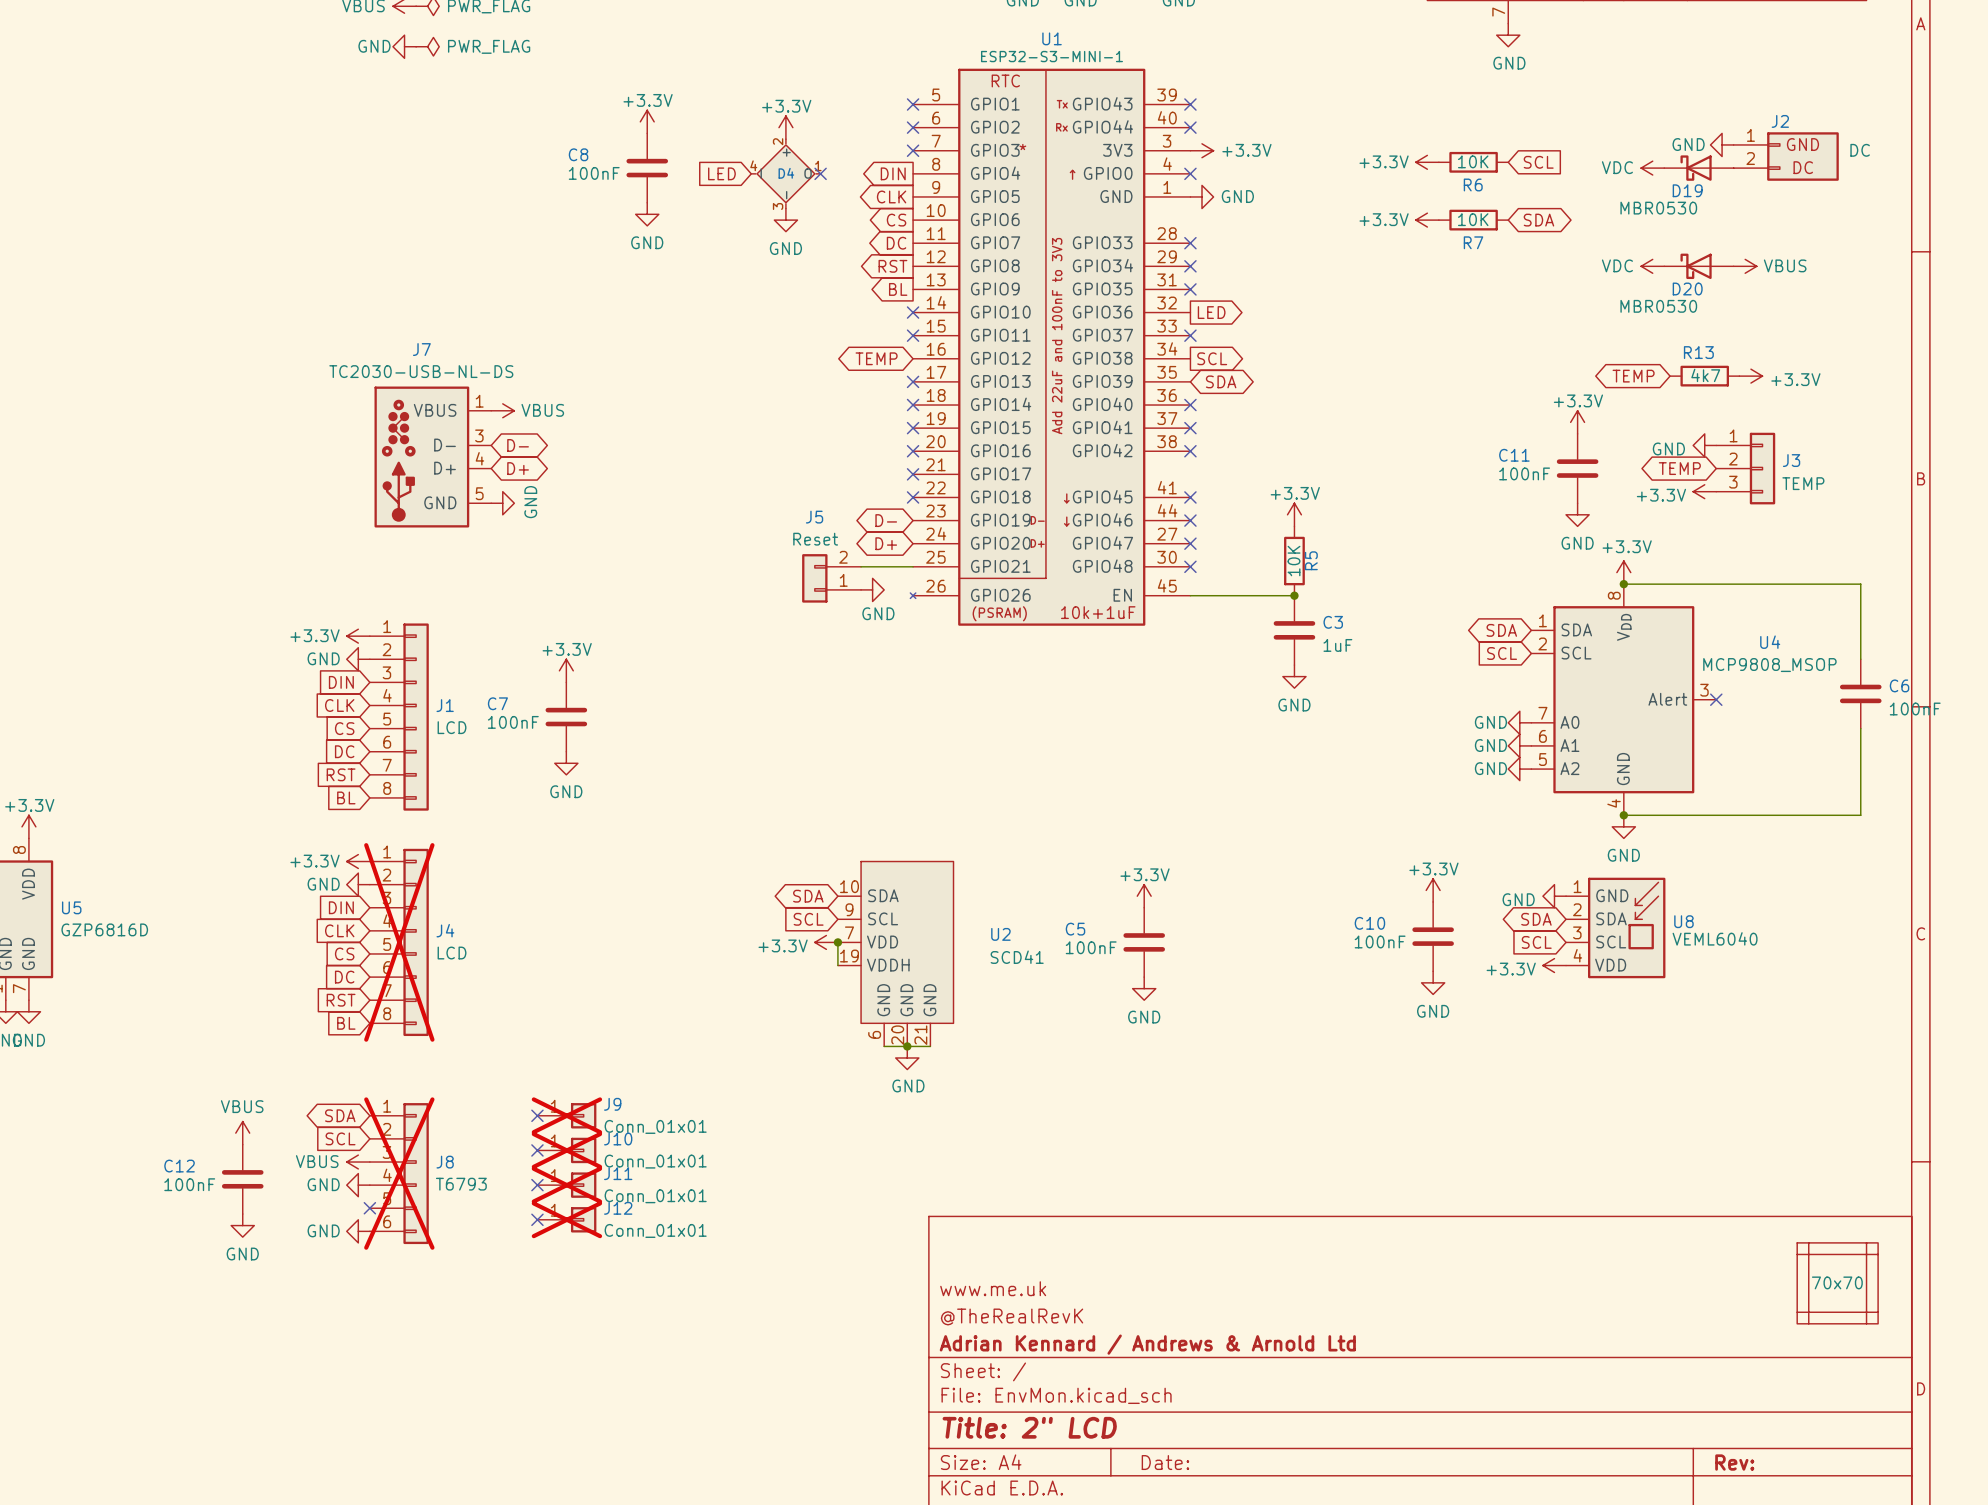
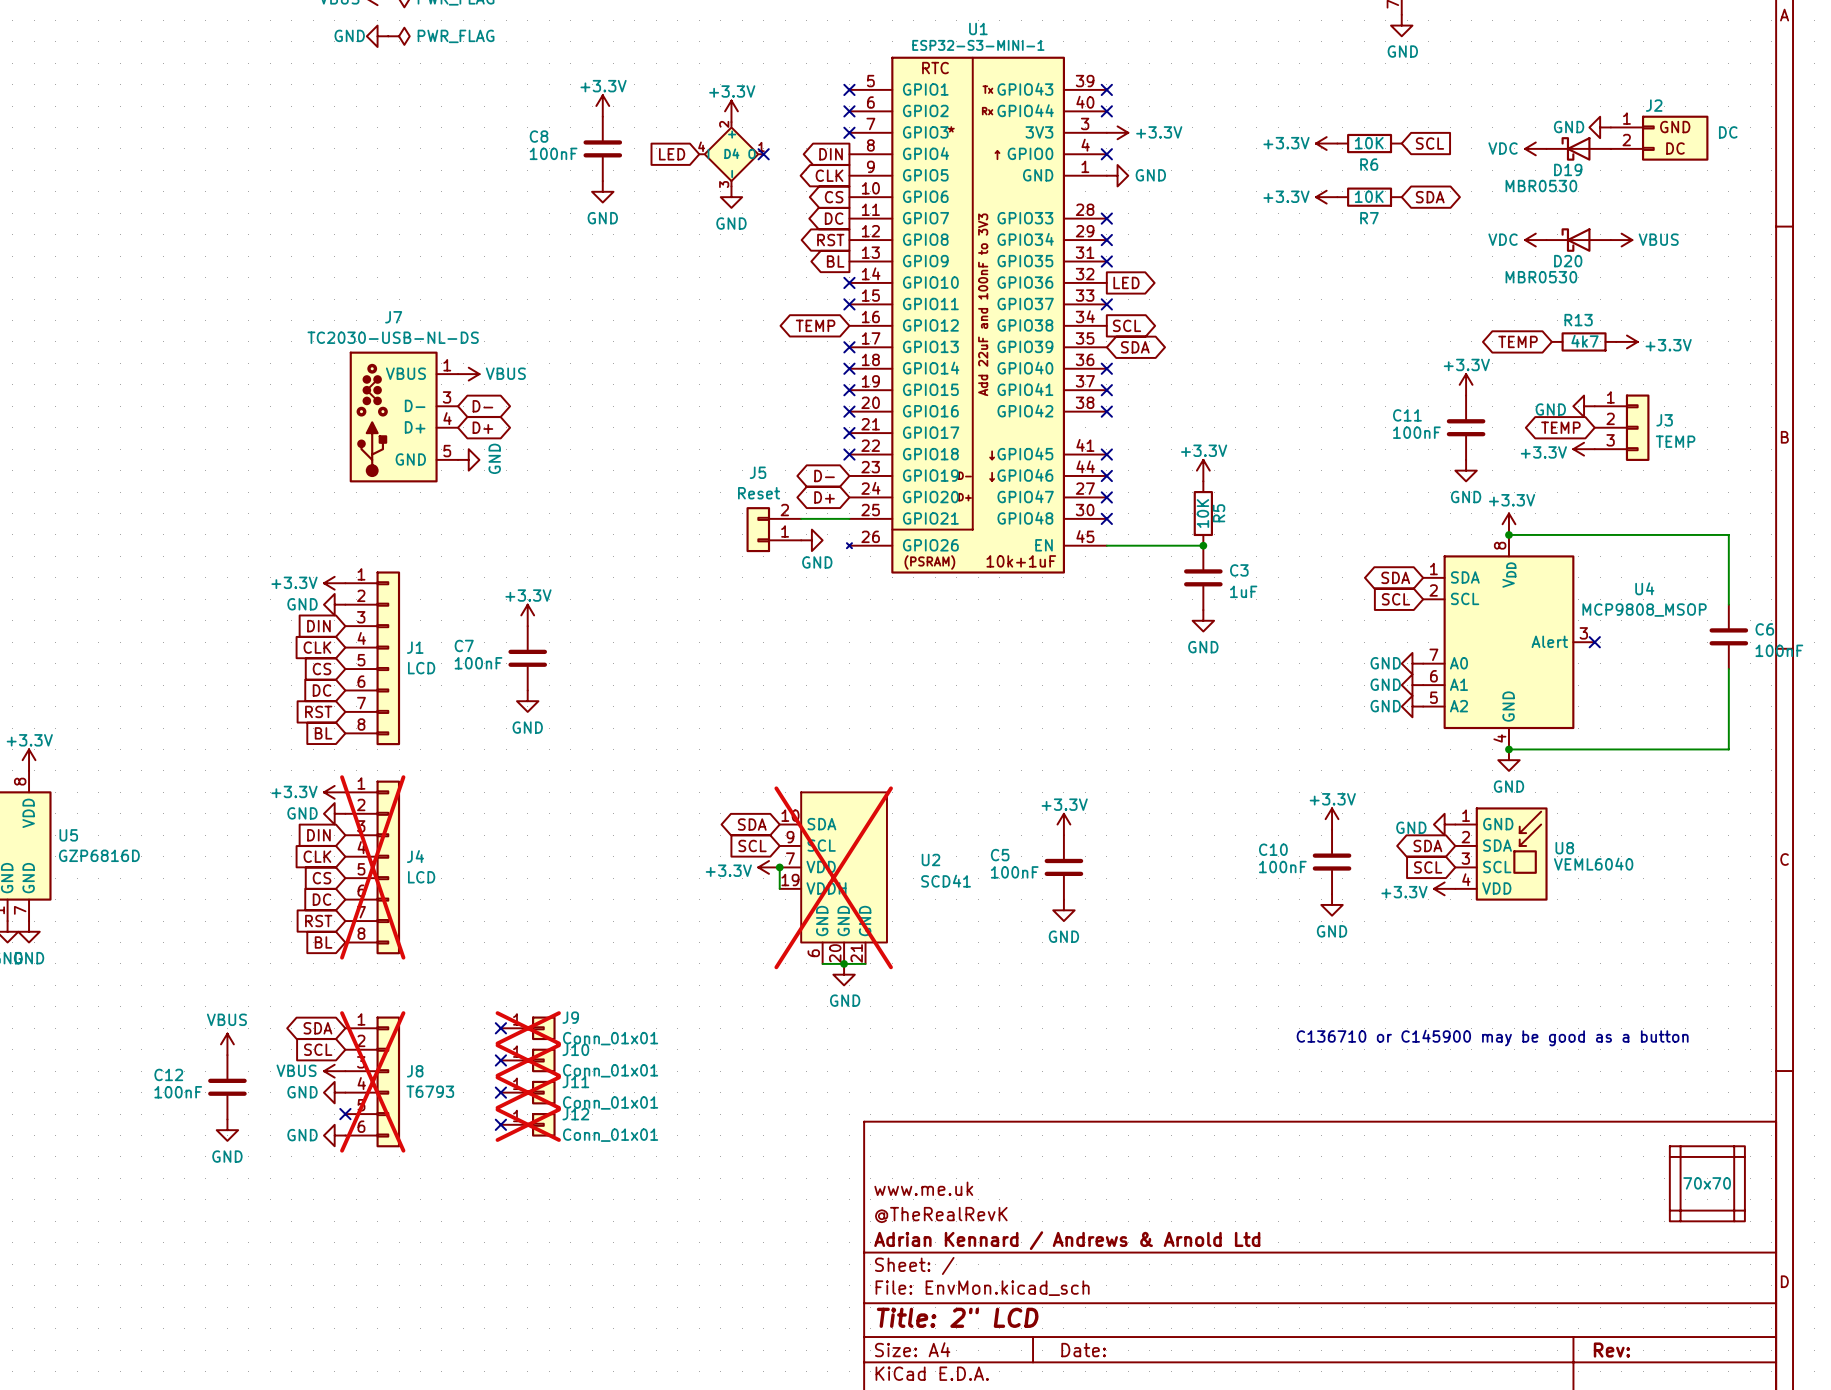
U2 do-not-place cross: none -> (833, 877)
text: none -> C136710 or C145900 may be good as a button (1492, 1038)

